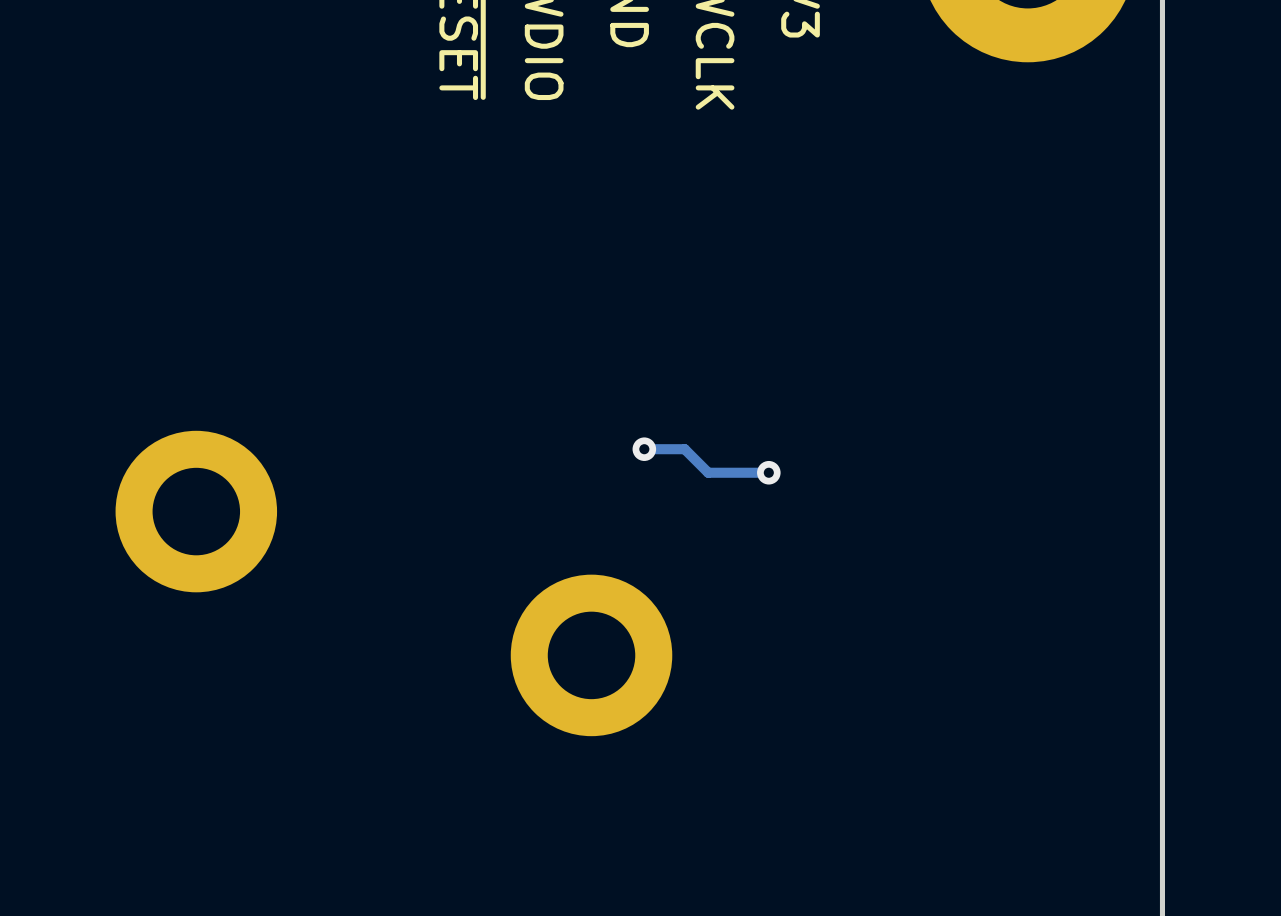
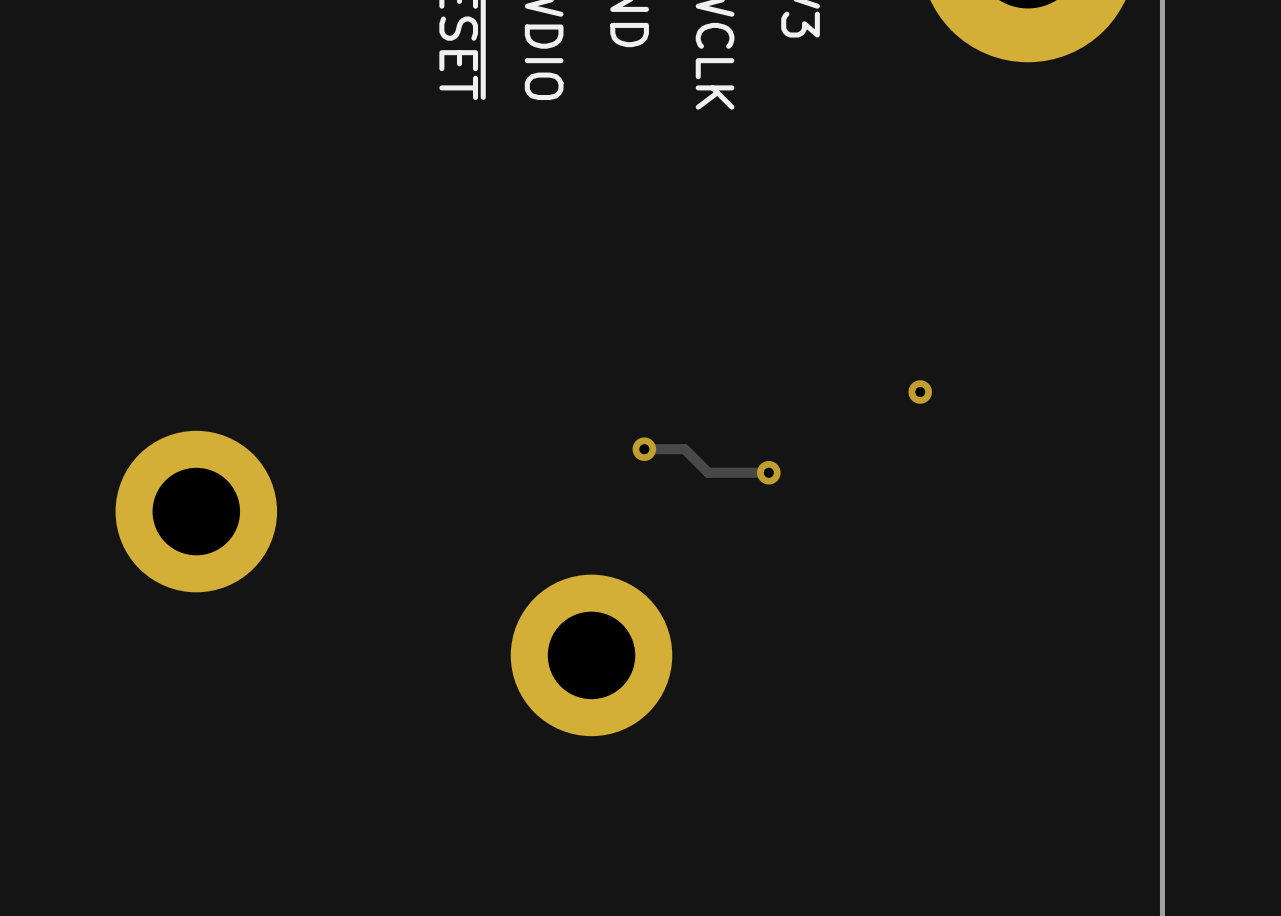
via: none -> (920, 392)

